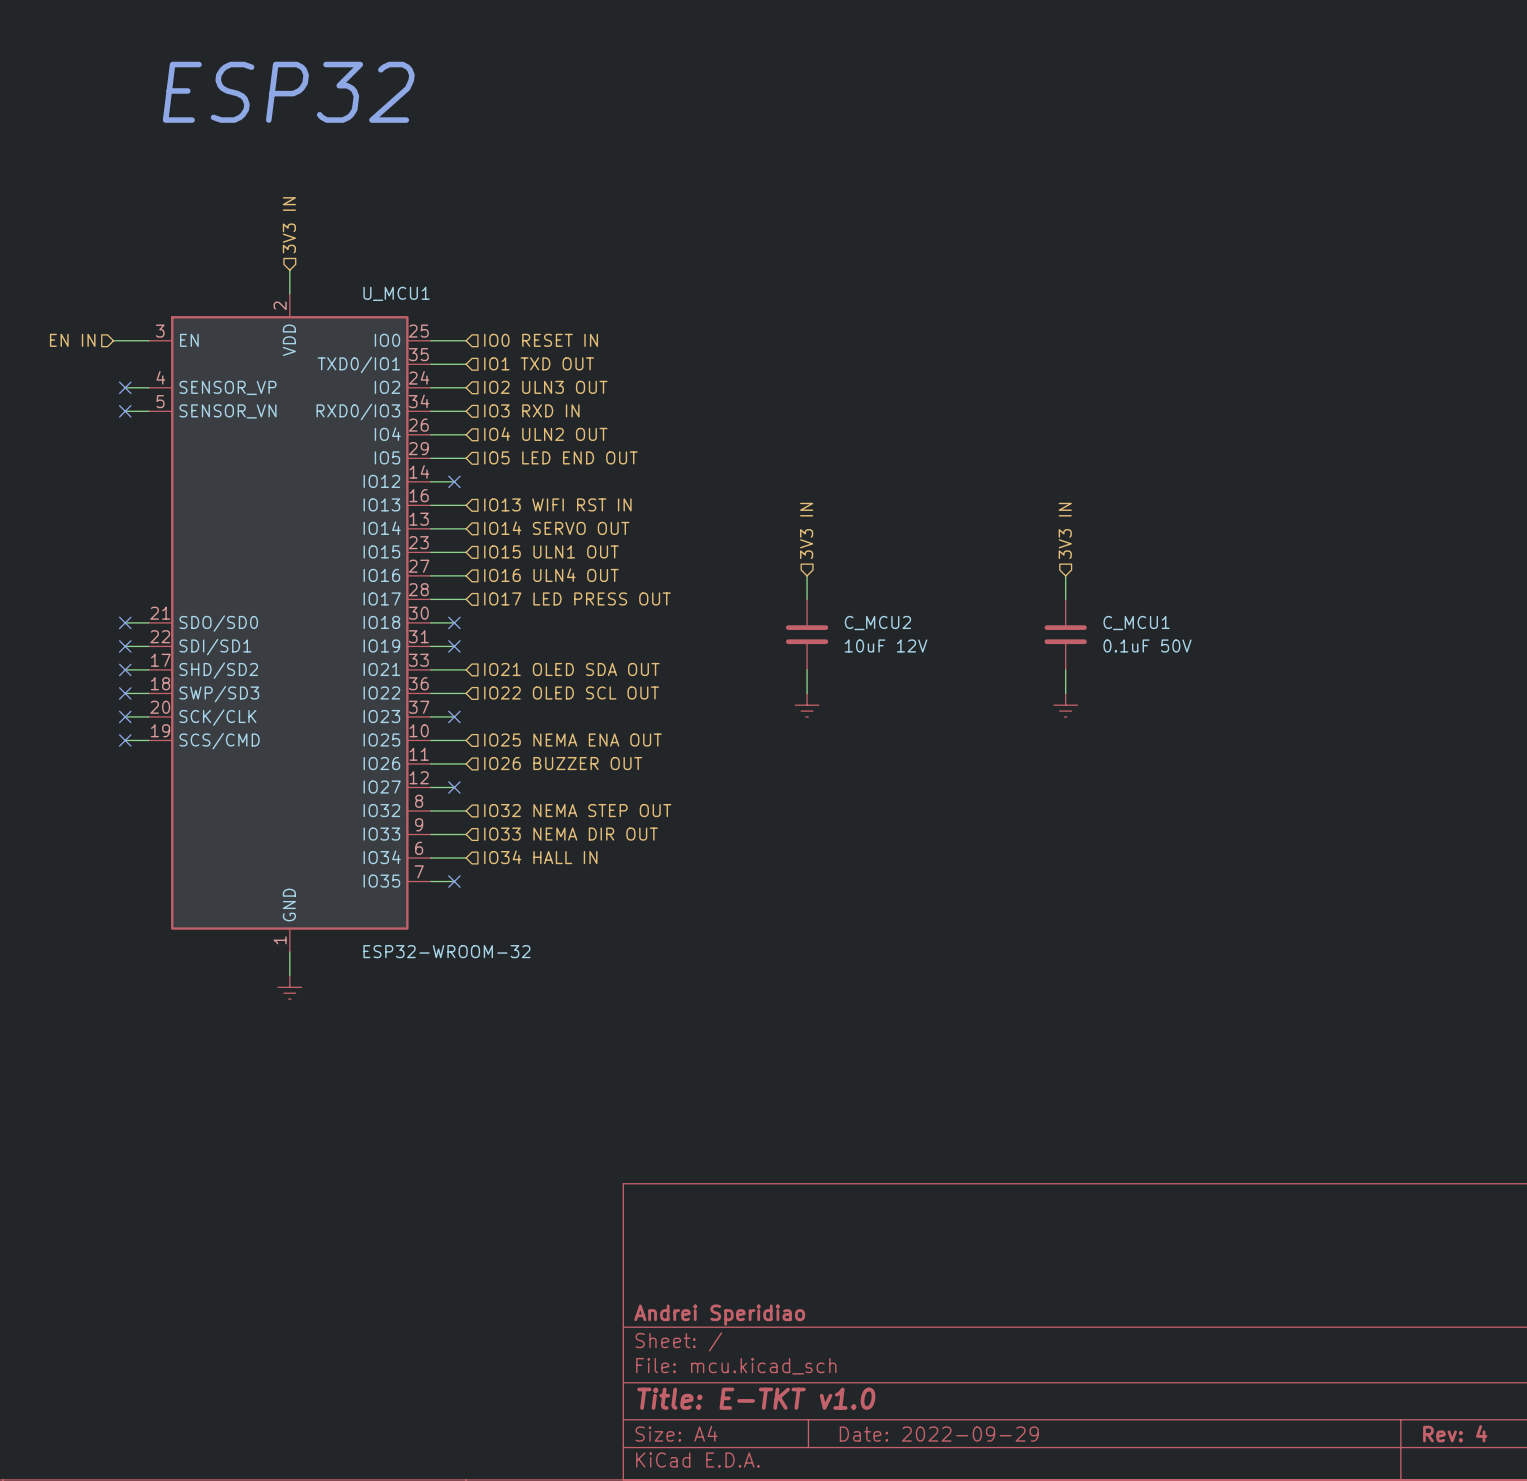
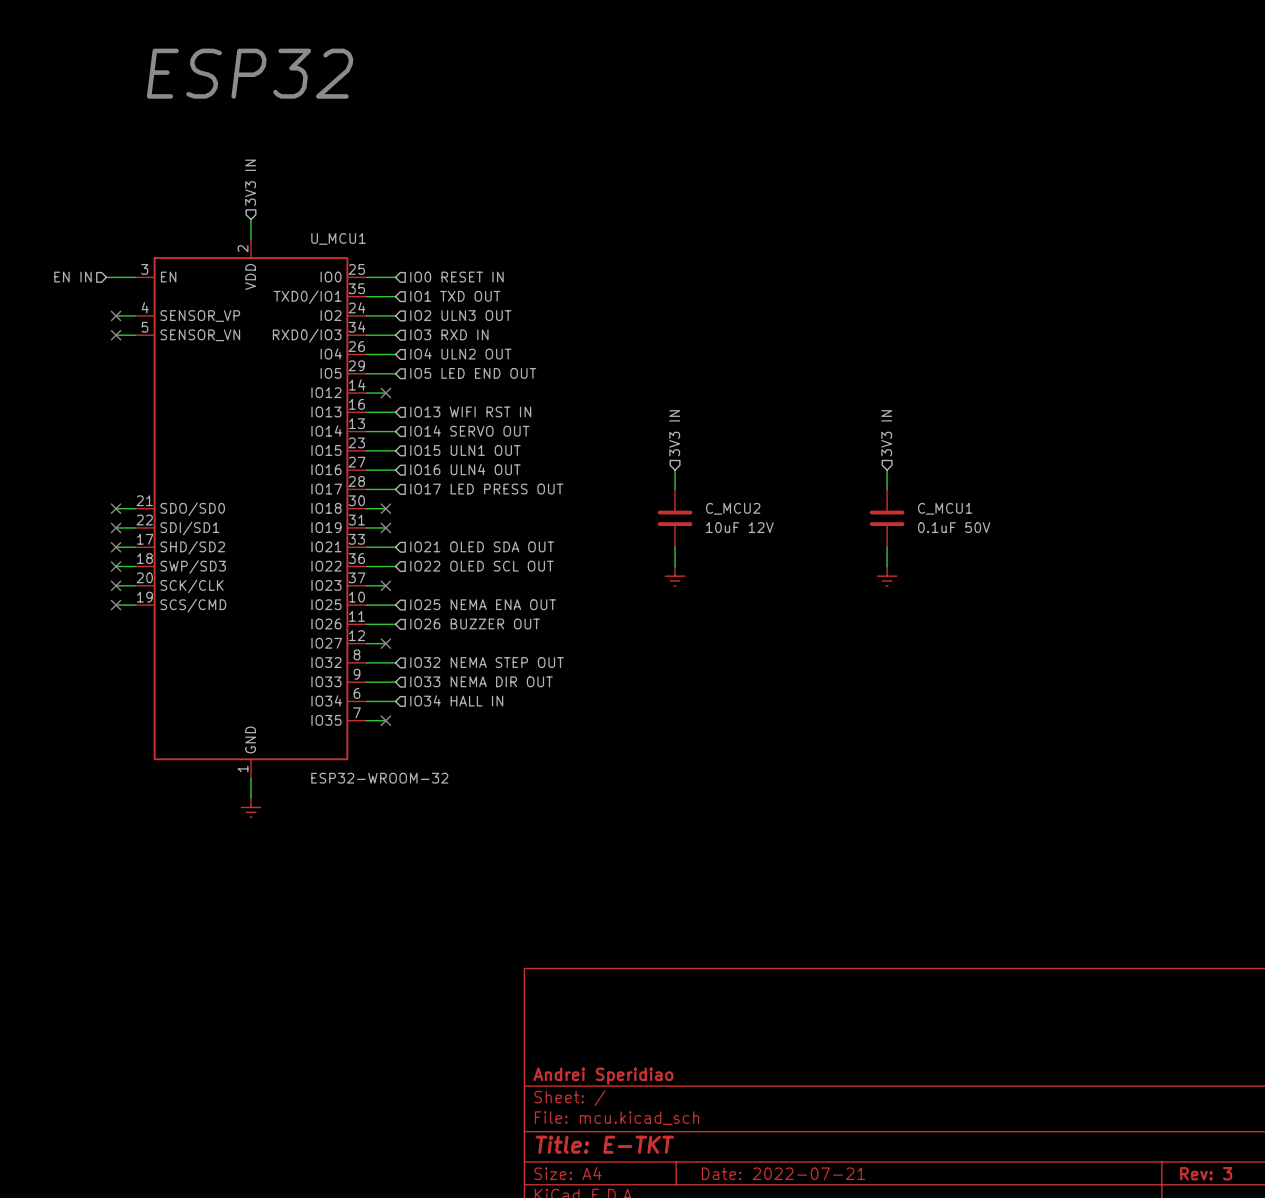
title block: Title: E-TKT v1.0 (756, 1398) -> Title: E-TKT (604, 1144)
title block: Rev: 4 (1455, 1433) -> Rev: 3 (1206, 1173)
title block: Date: 2022-09-29 (939, 1434) -> Date: 2022-07-21 (783, 1173)

